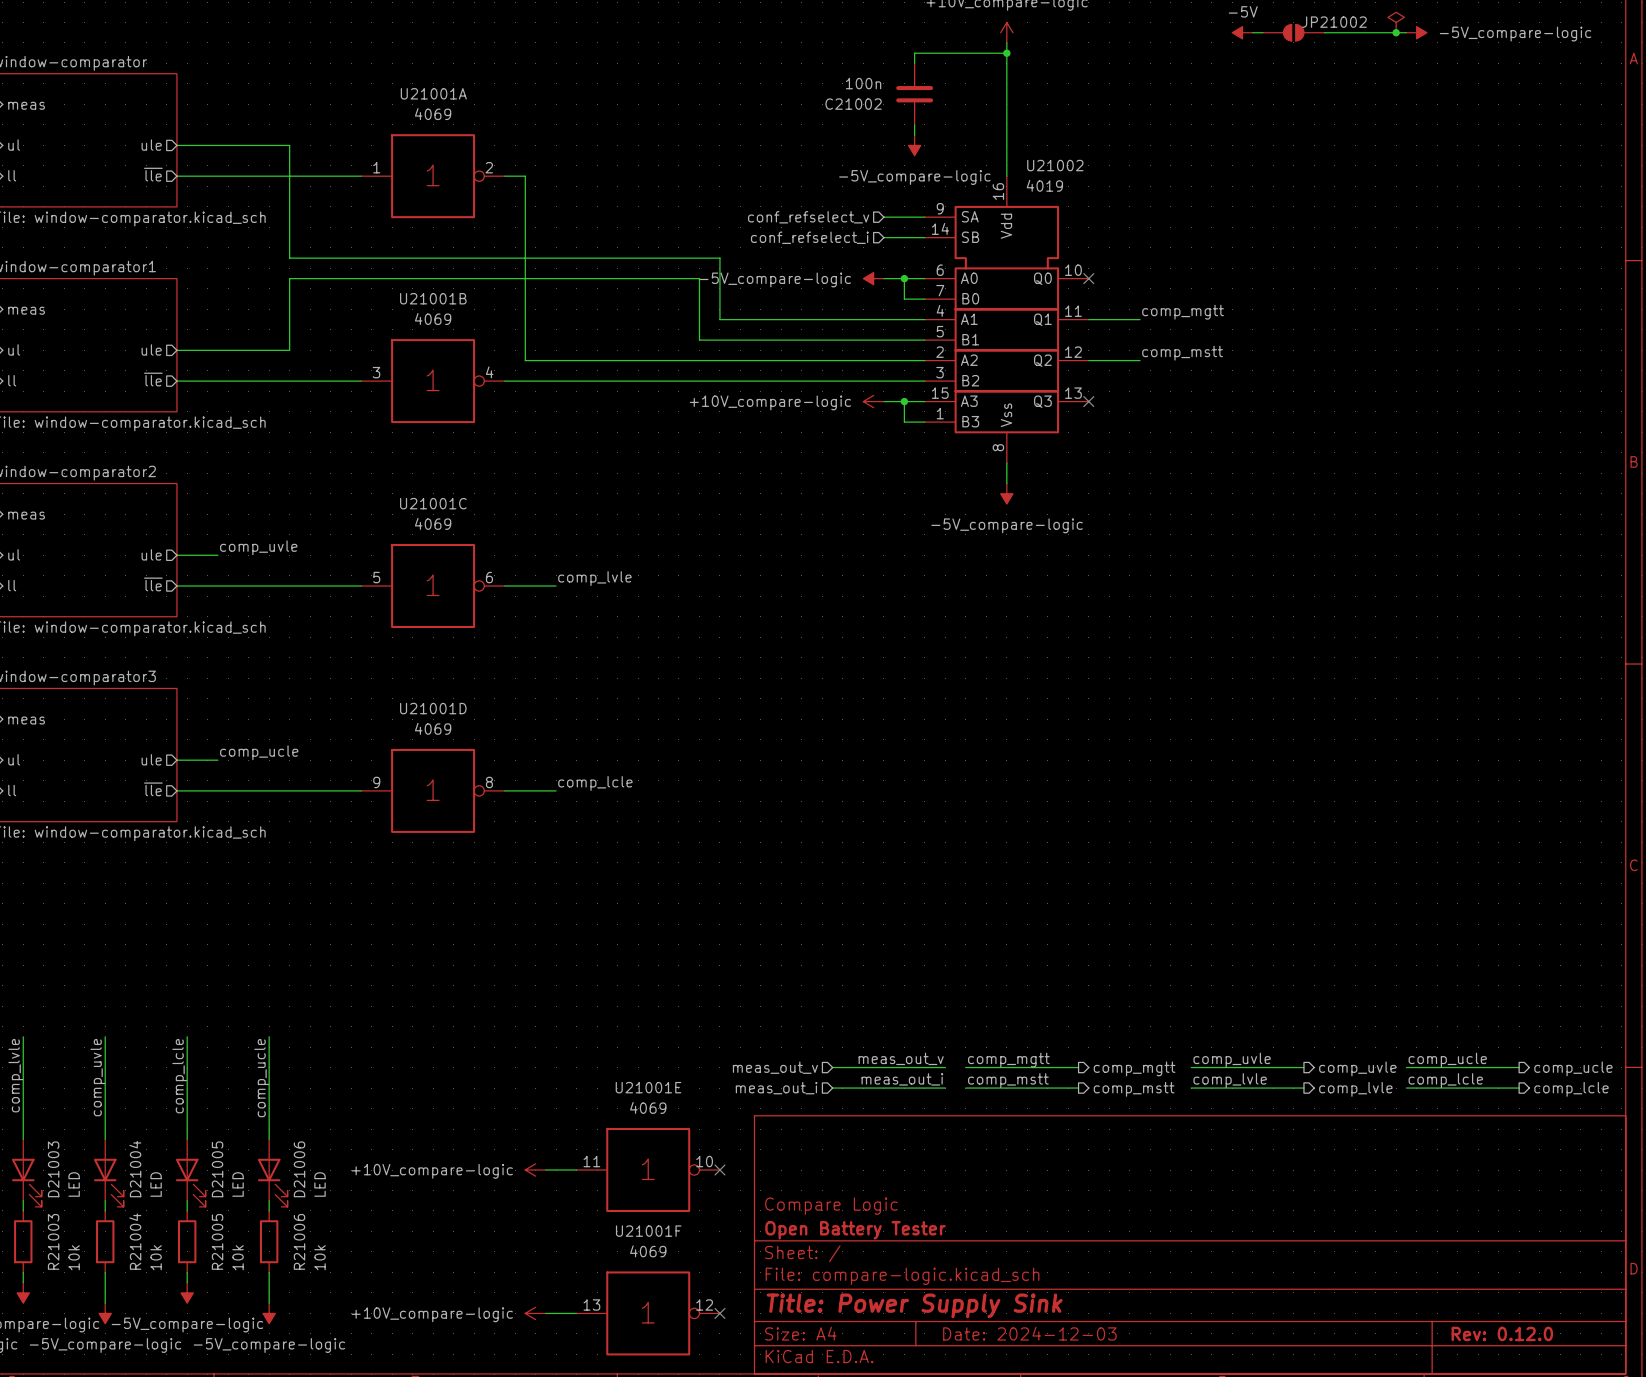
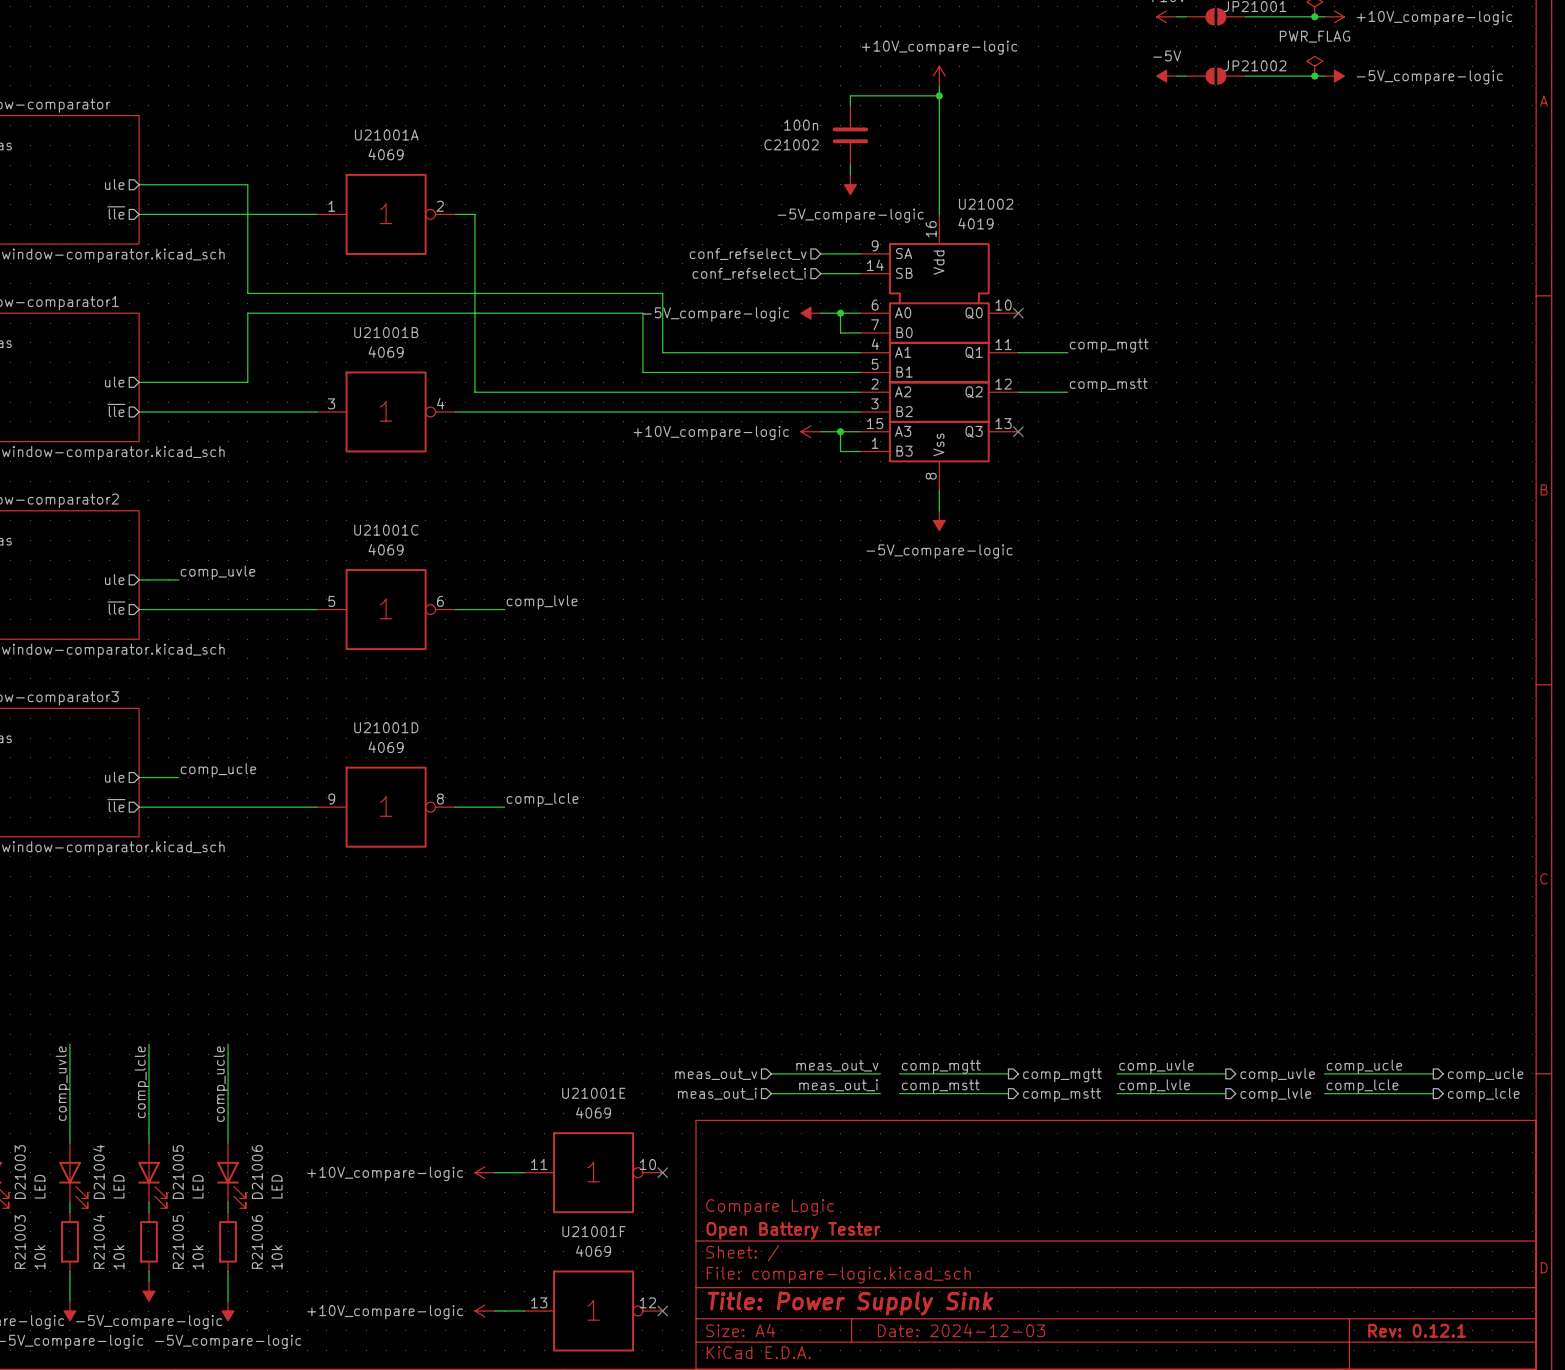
title block: Rev: 0.12.0 (1502, 1333) -> Rev: 0.12.1 (1417, 1330)

